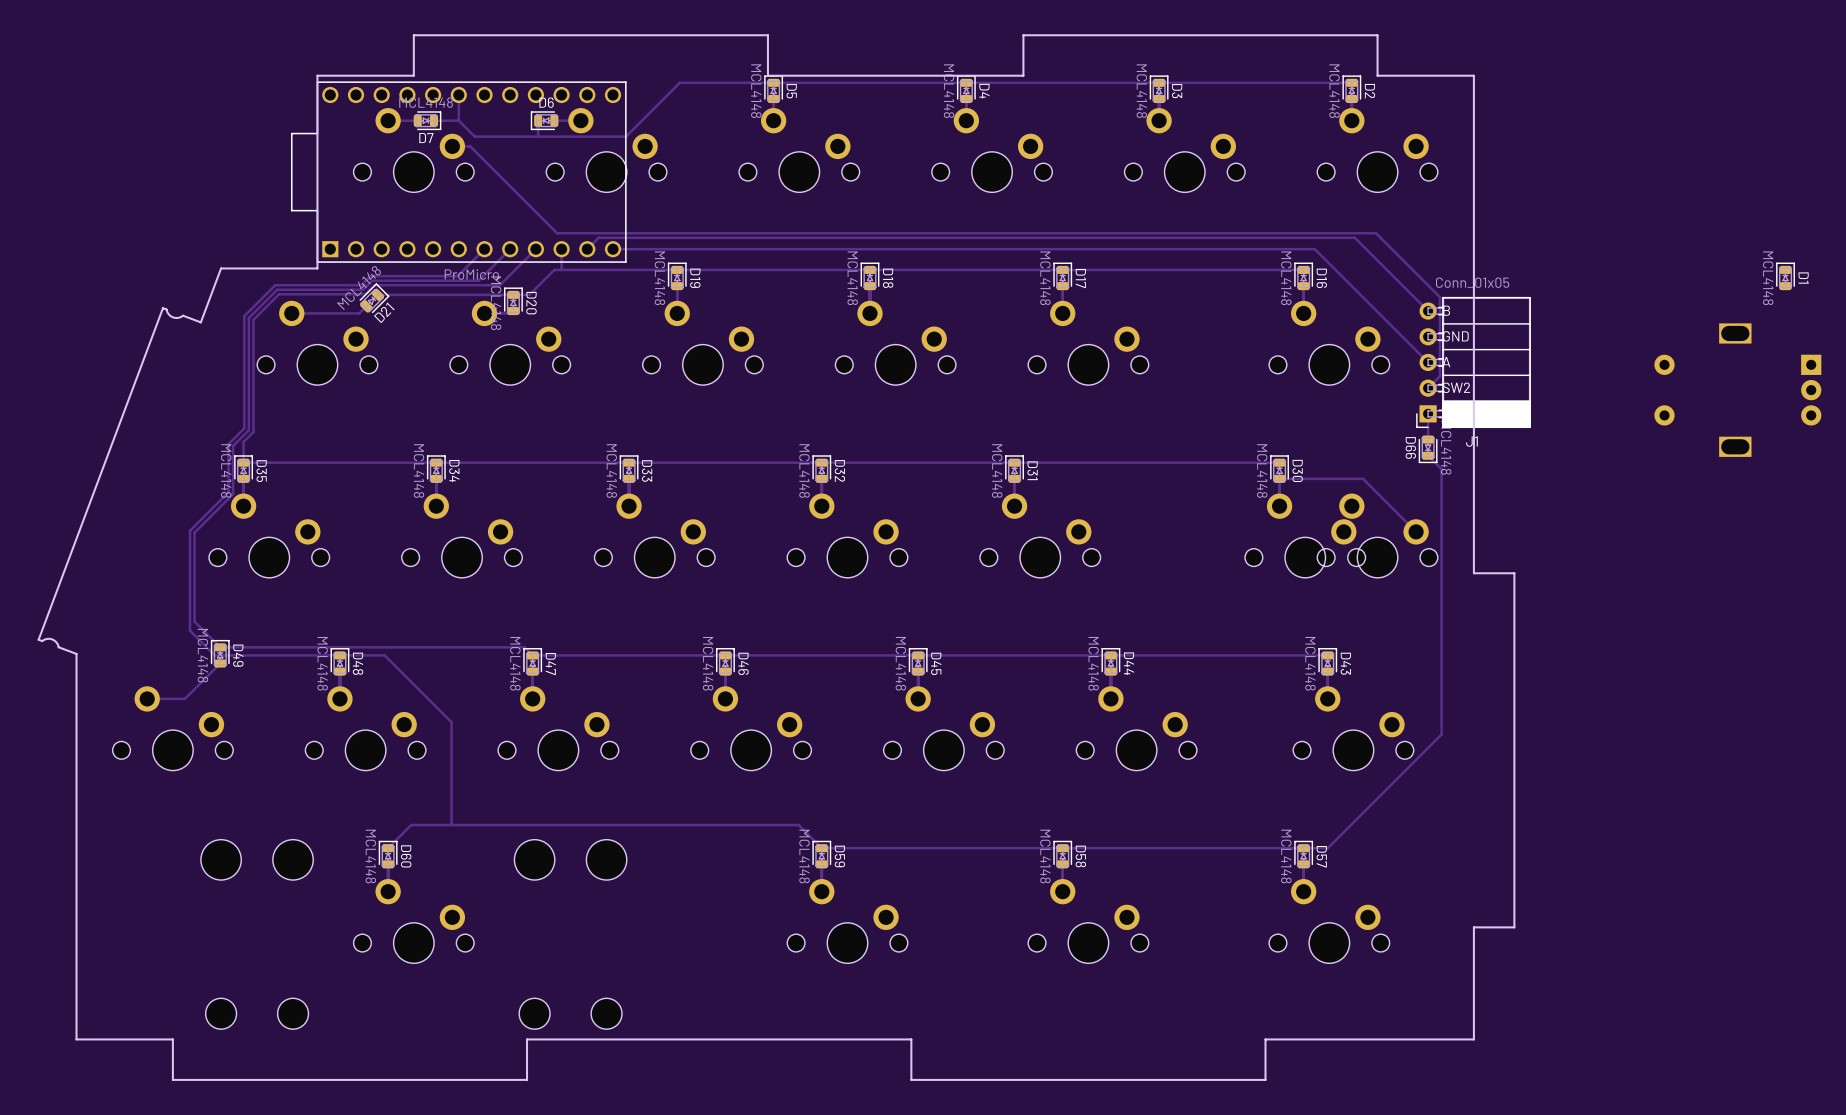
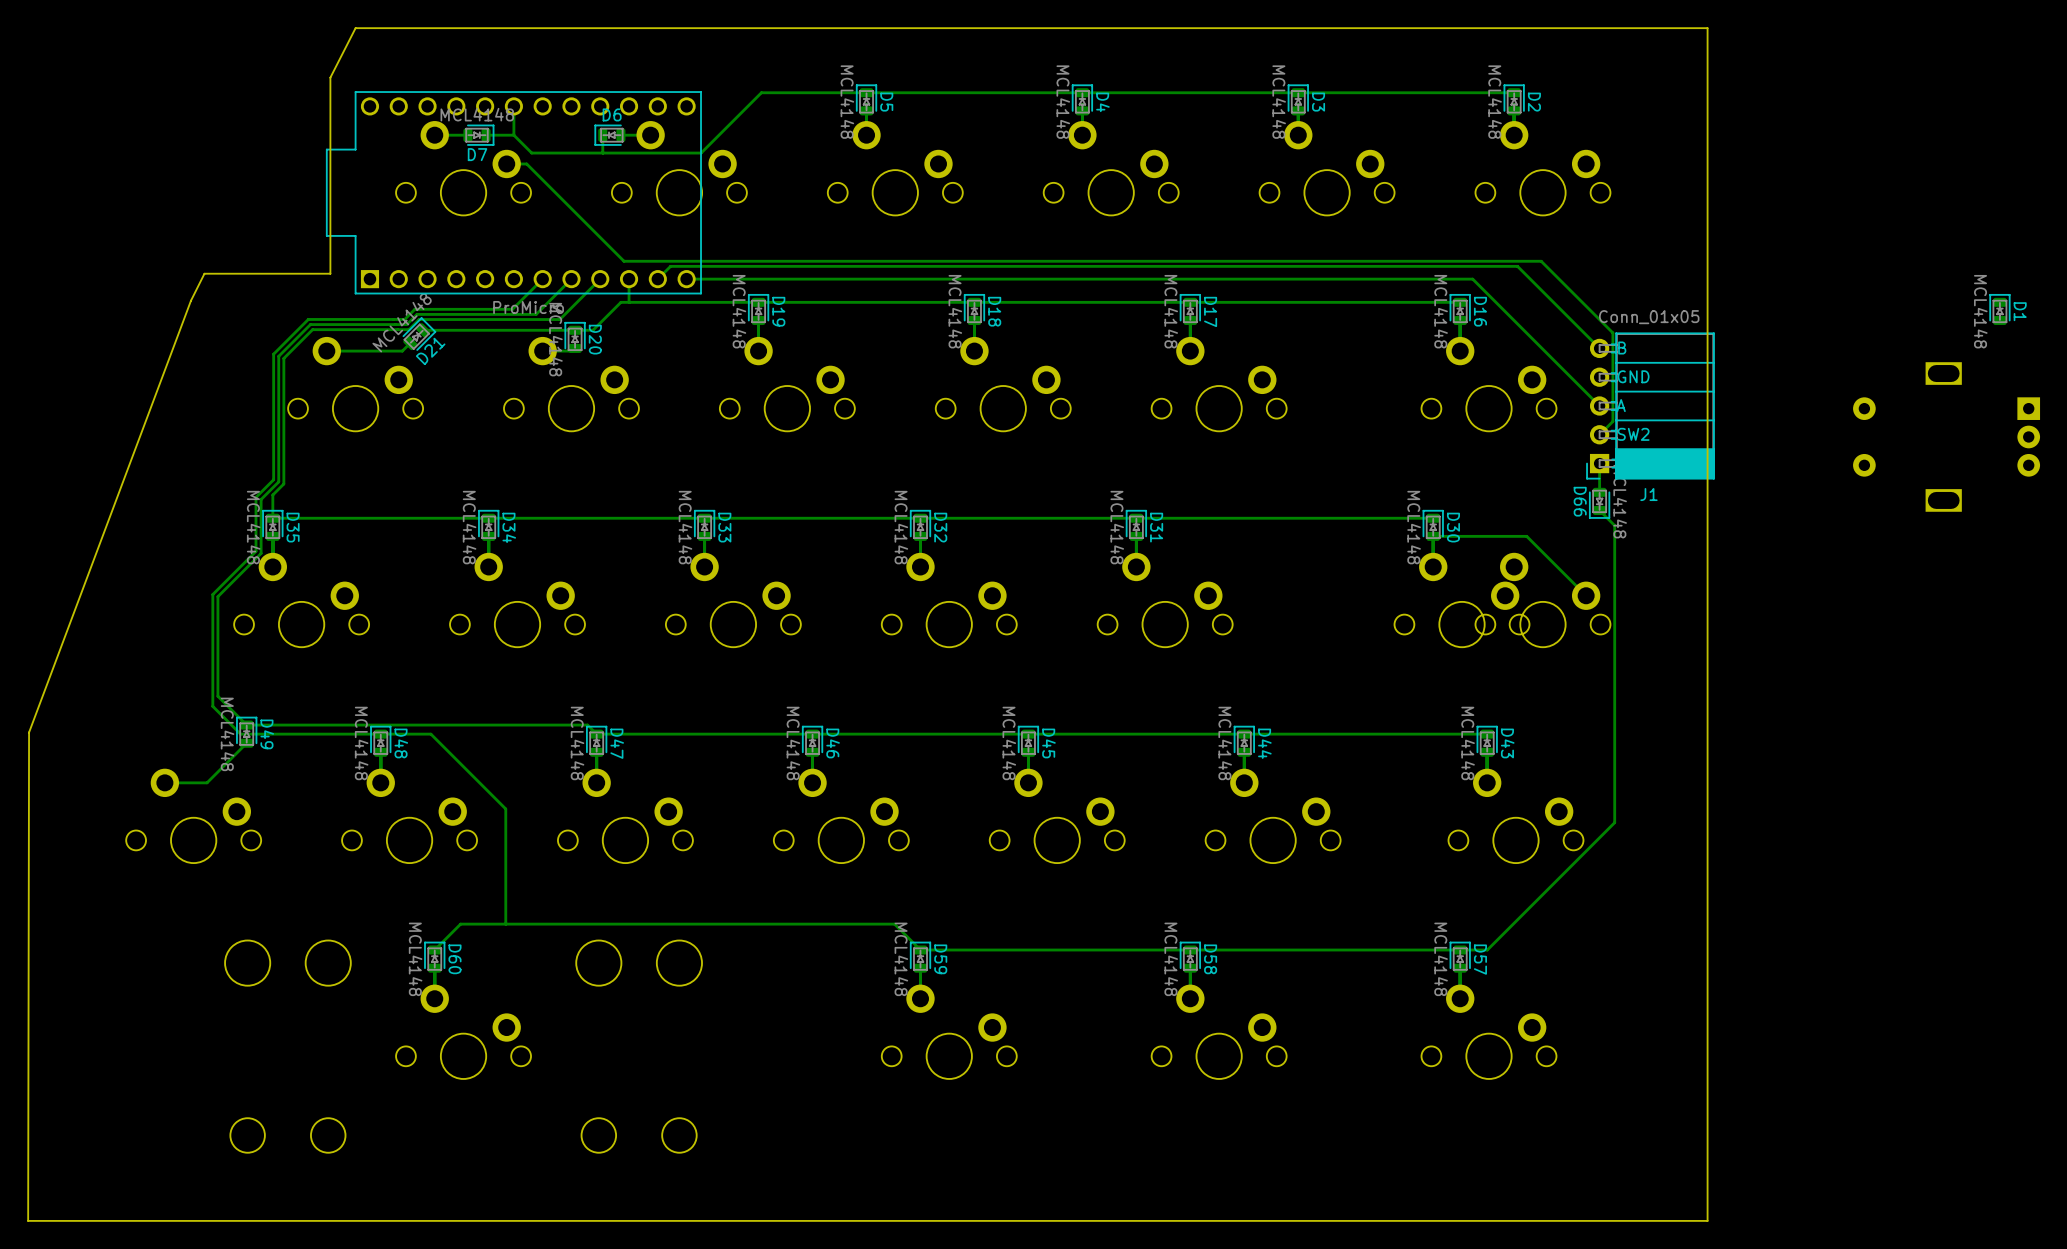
board edge: (1377, 35) (1377, 75) (1473, 75) (1473, 573) (1514, 573) (1514, 927) (1473, 927) (1473, 1039) (1265, 1039) (1265, 1079) (911, 1079) (911, 1039) (527, 1039) (527, 1079) (172, 1079) (172, 1039) (76, 1039) (76, 653) (58, 647) (52, 639) (38, 639) (162, 308) (173, 317) (183, 315) (200, 322) (221, 268) (317, 268) (317, 75) (413, 75) (413, 35) (767, 35) (767, 75) (1023, 75) (1023, 35) (1377, 35) -> (1707, 28) (1707, 1220) (28, 1220) (29, 732) (190, 300) (204, 273) (330, 273) (330, 77) (355, 28) (1707, 28)

